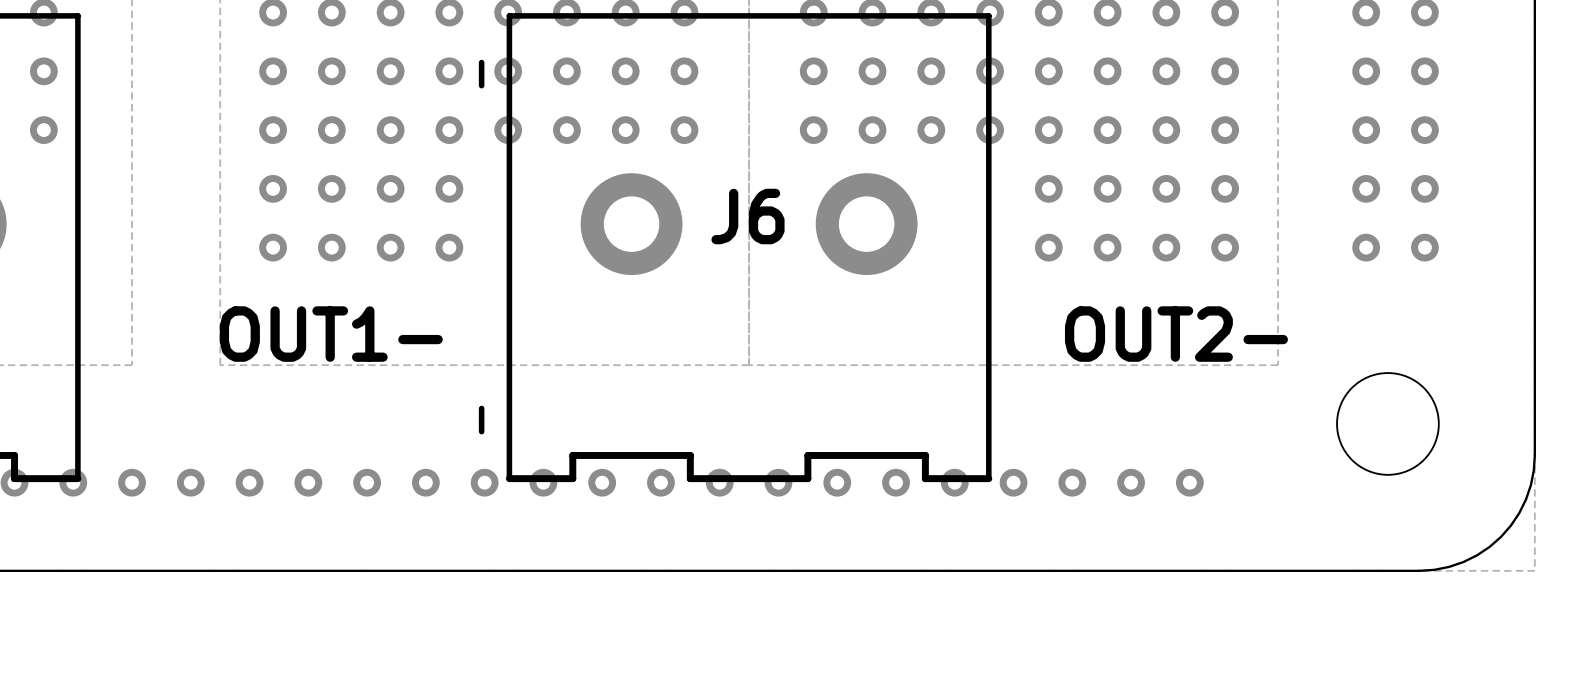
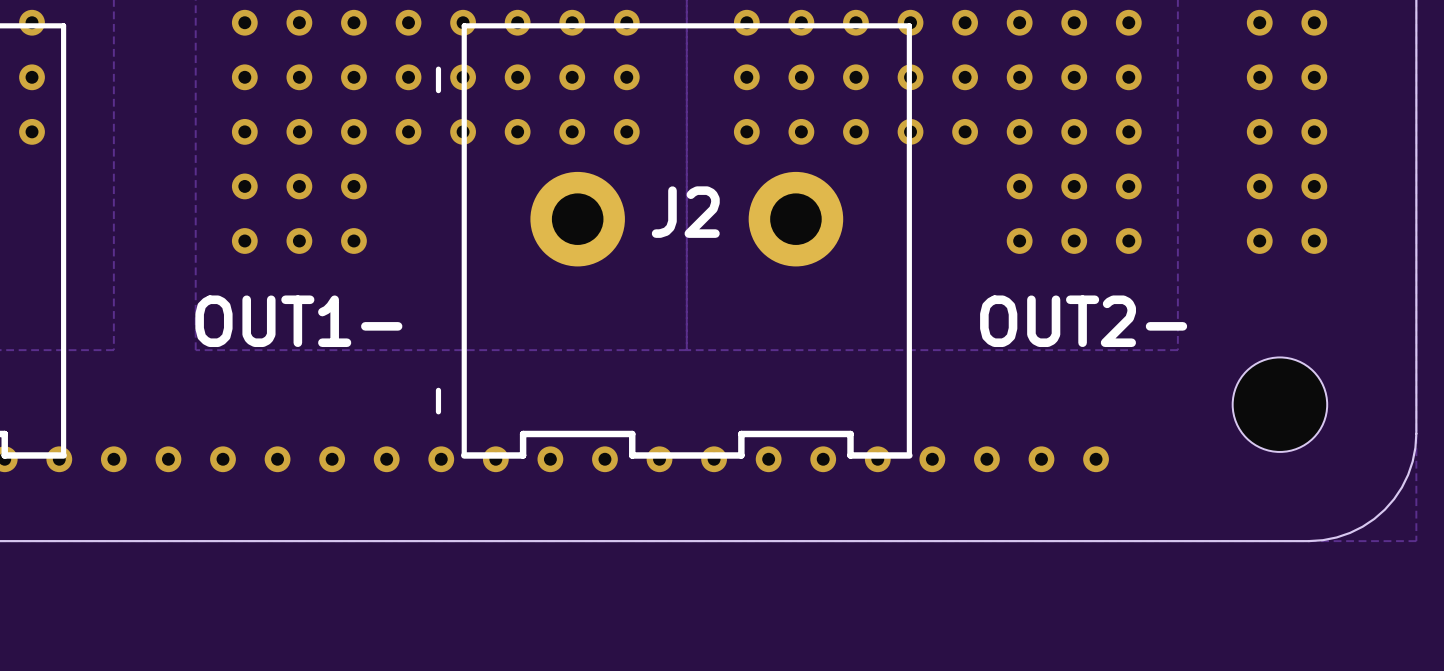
via: (449, 188) -> none
via: (1048, 188) -> none
J6 name: J6 (748, 216) -> J2 (685, 212)
via: (449, 247) -> none
via: (1048, 247) -> none

